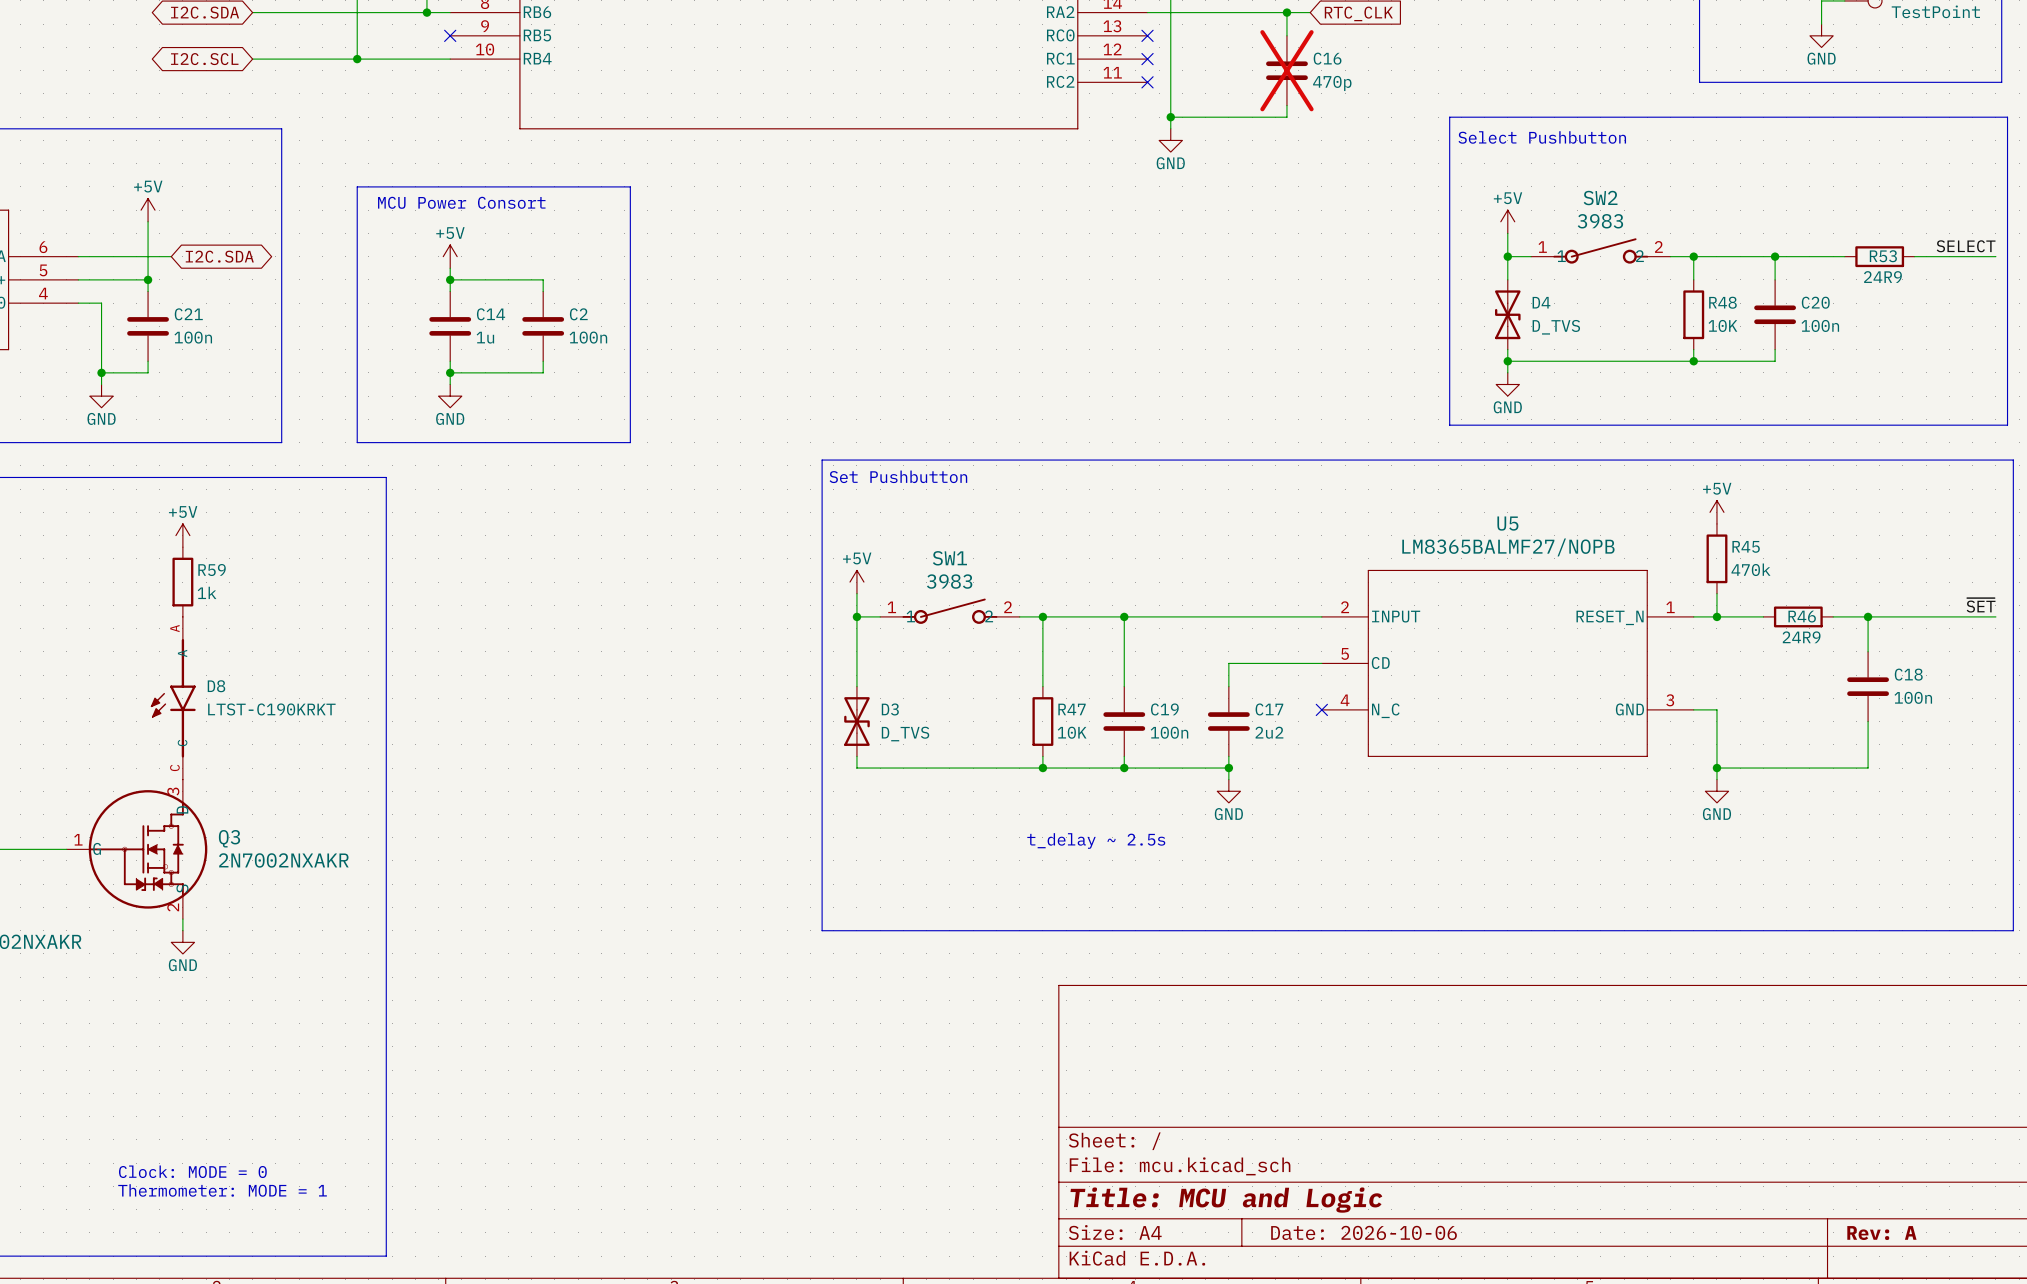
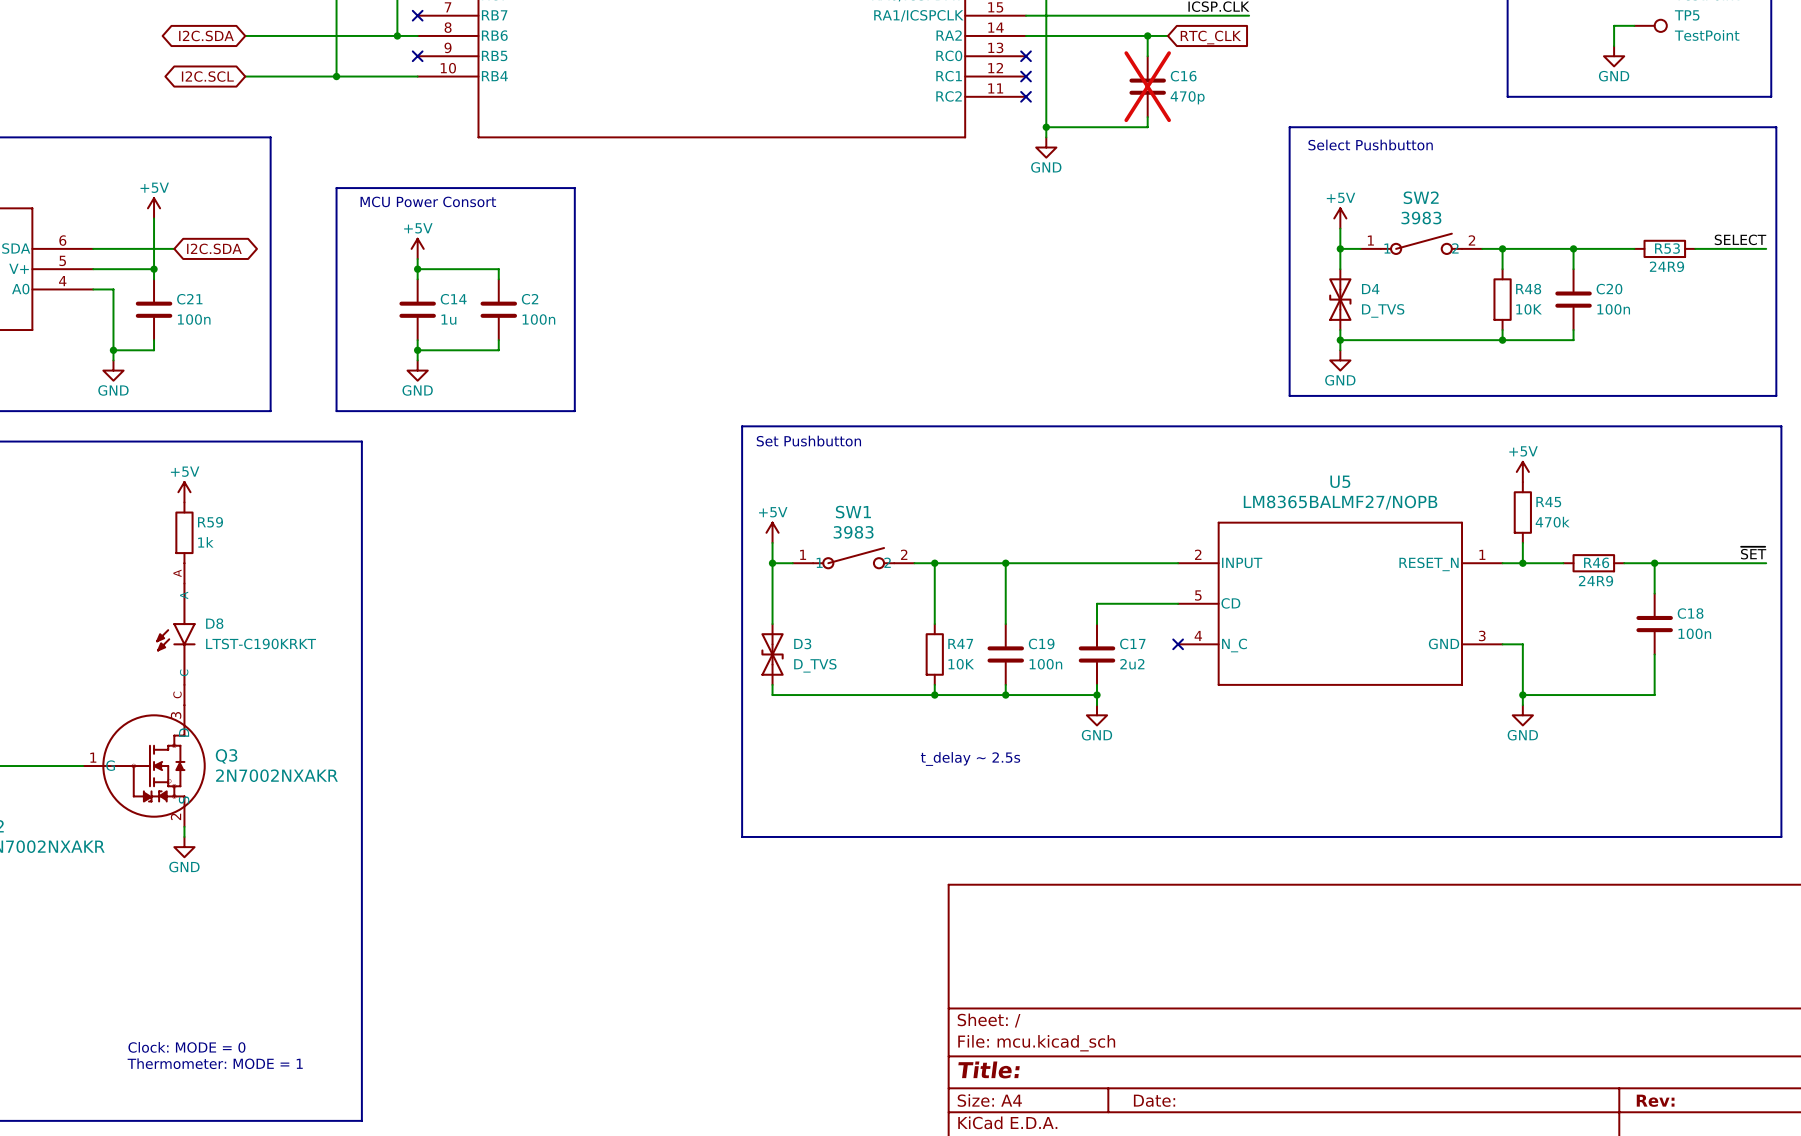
title block: Title: MCU and Logic (1226, 1200) -> Title: (989, 1069)
title block: Date: 2026-10-06 (1364, 1232) -> Date: (1154, 1100)
title block: Rev: A (1881, 1233) -> Rev: (1655, 1100)

